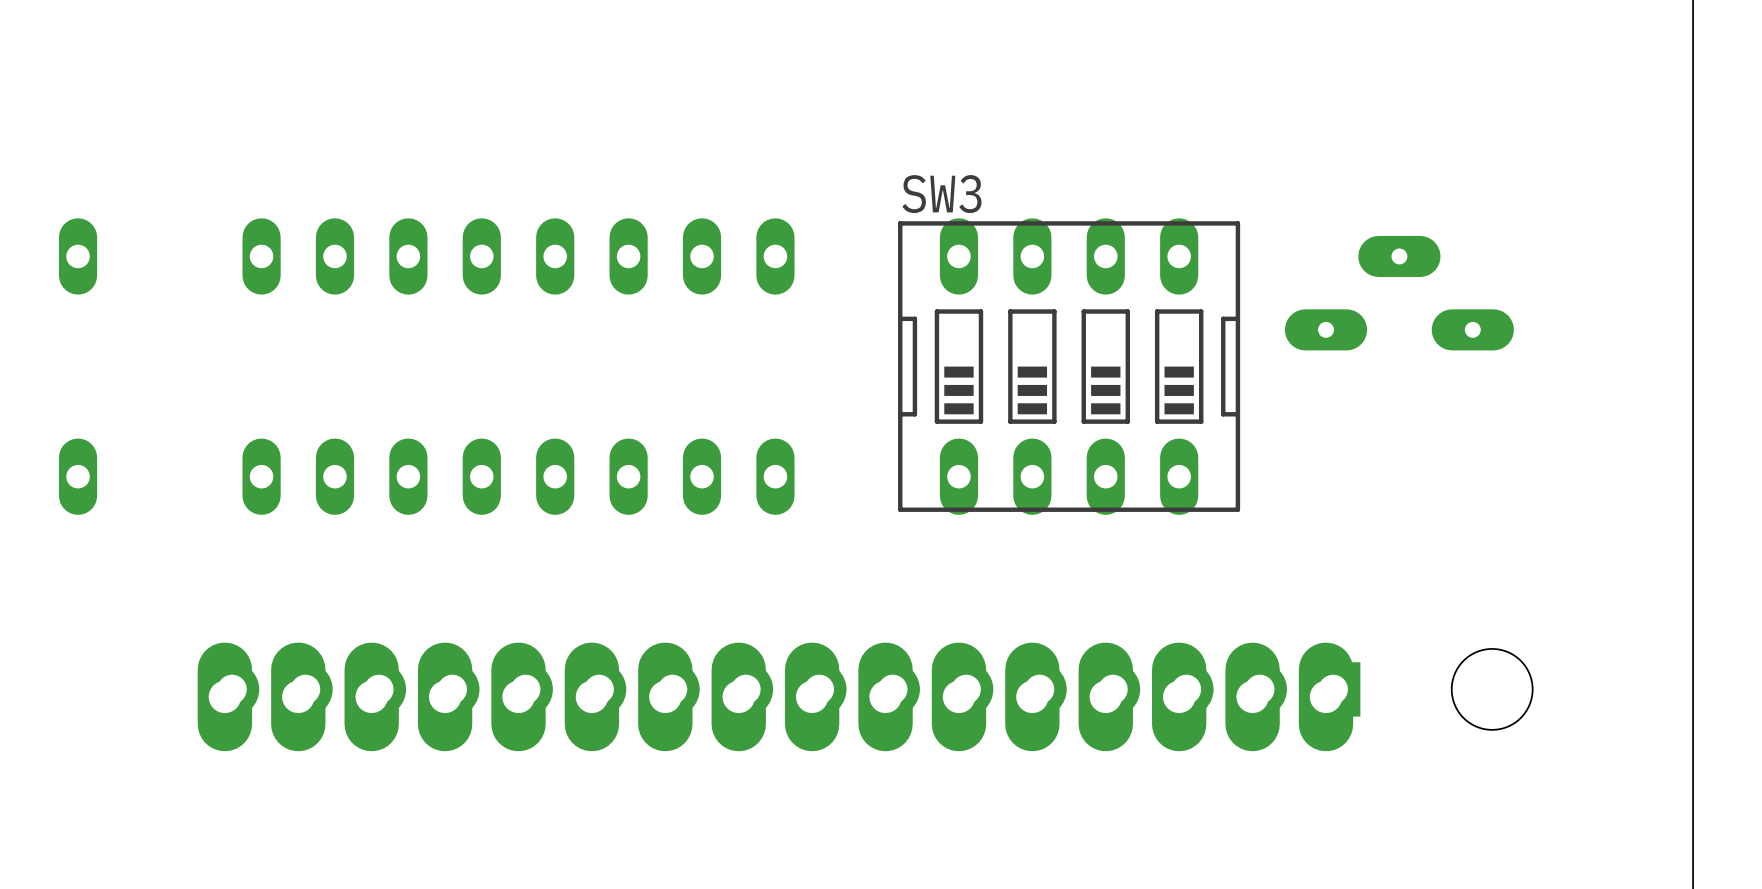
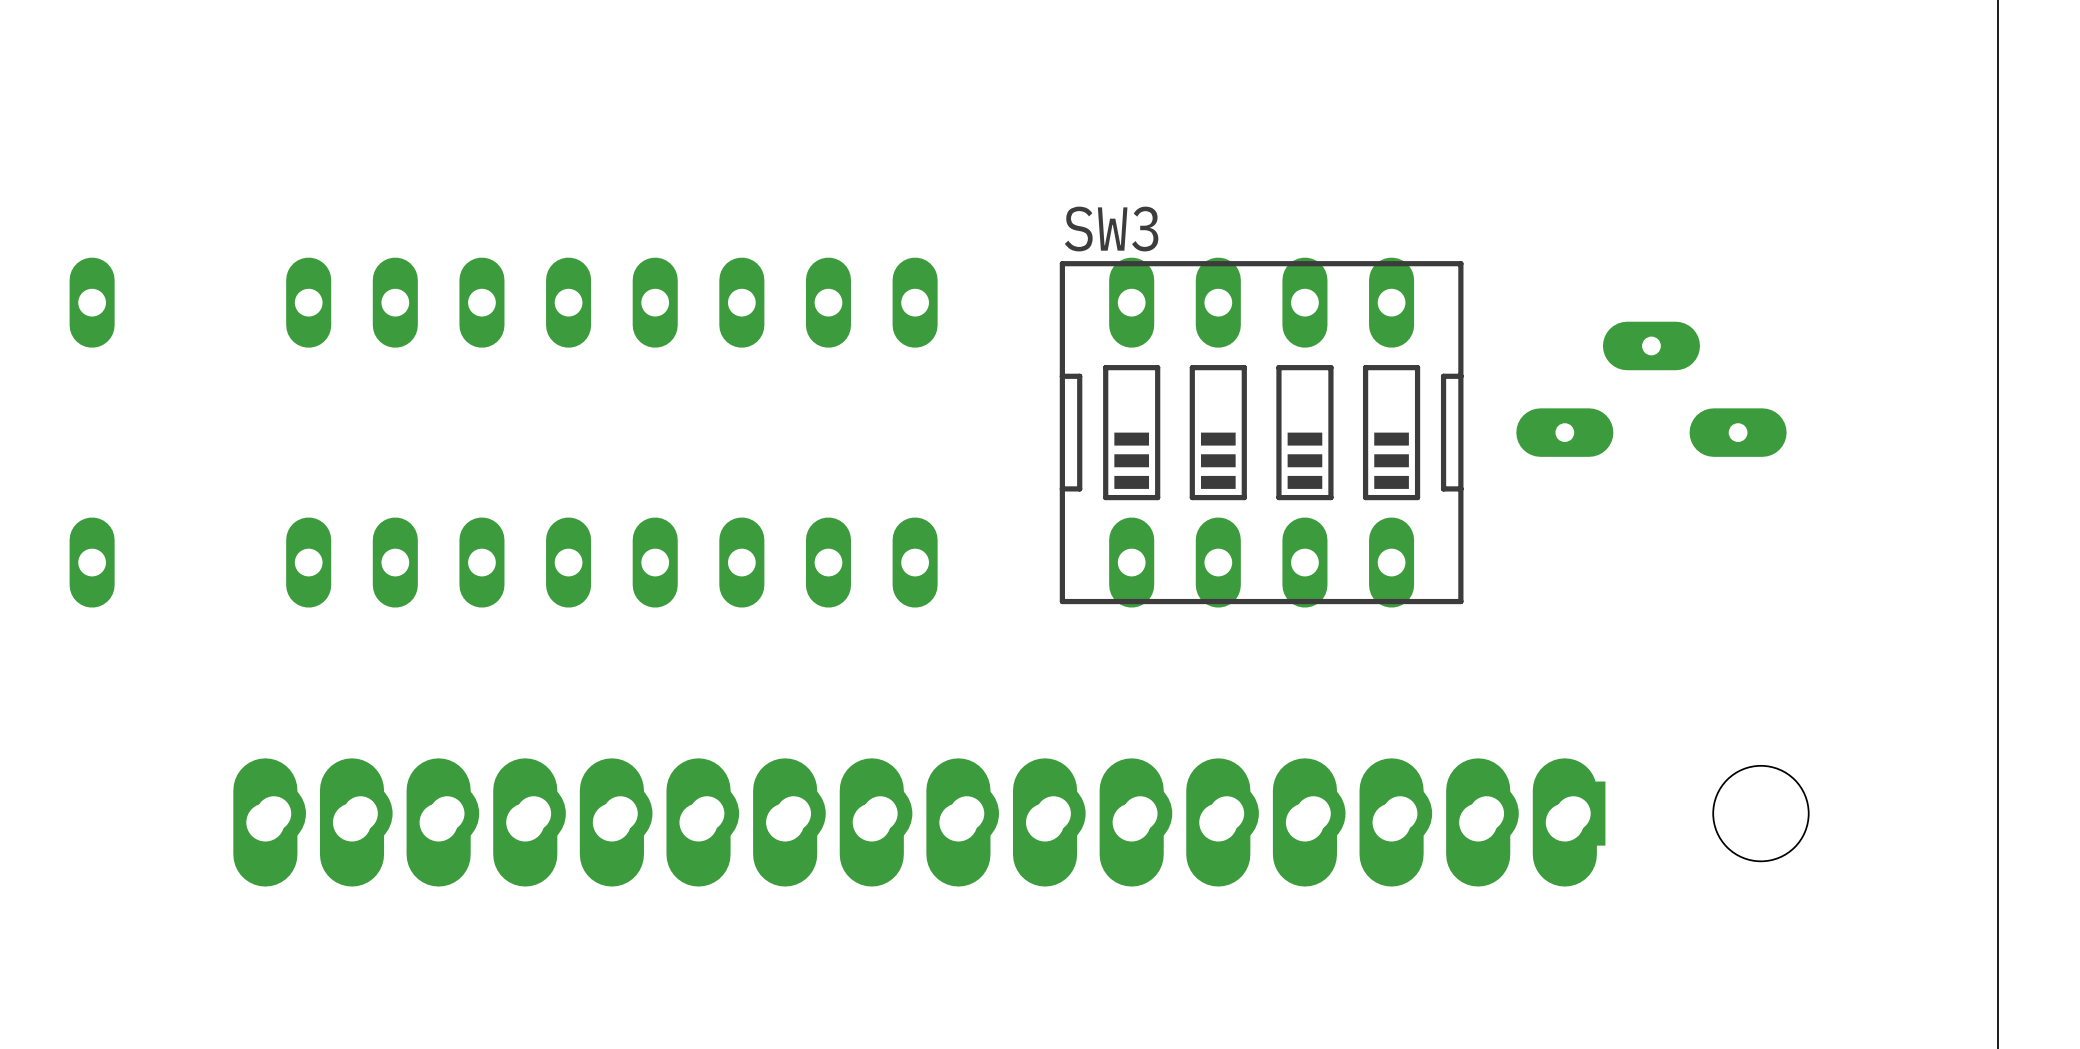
part position: (1399, 293) -> (1651, 389)

